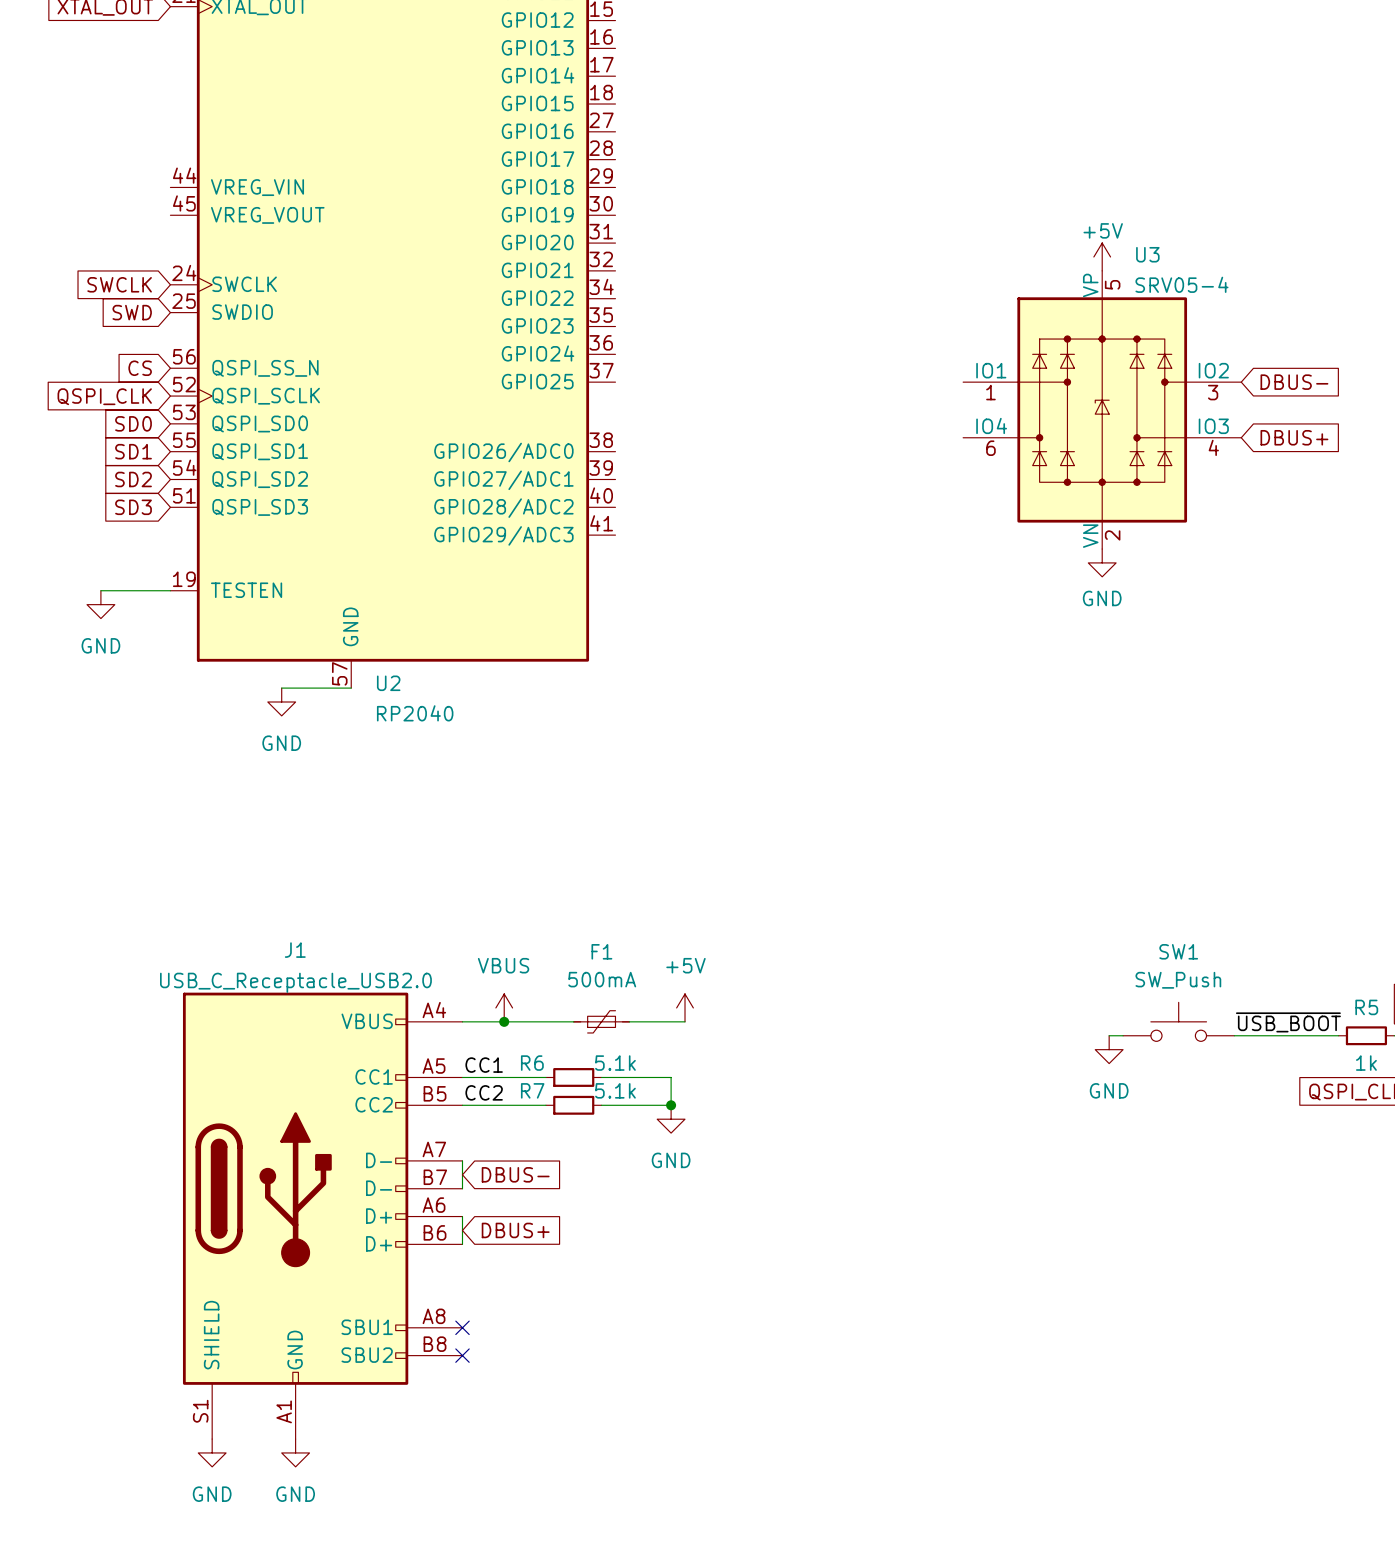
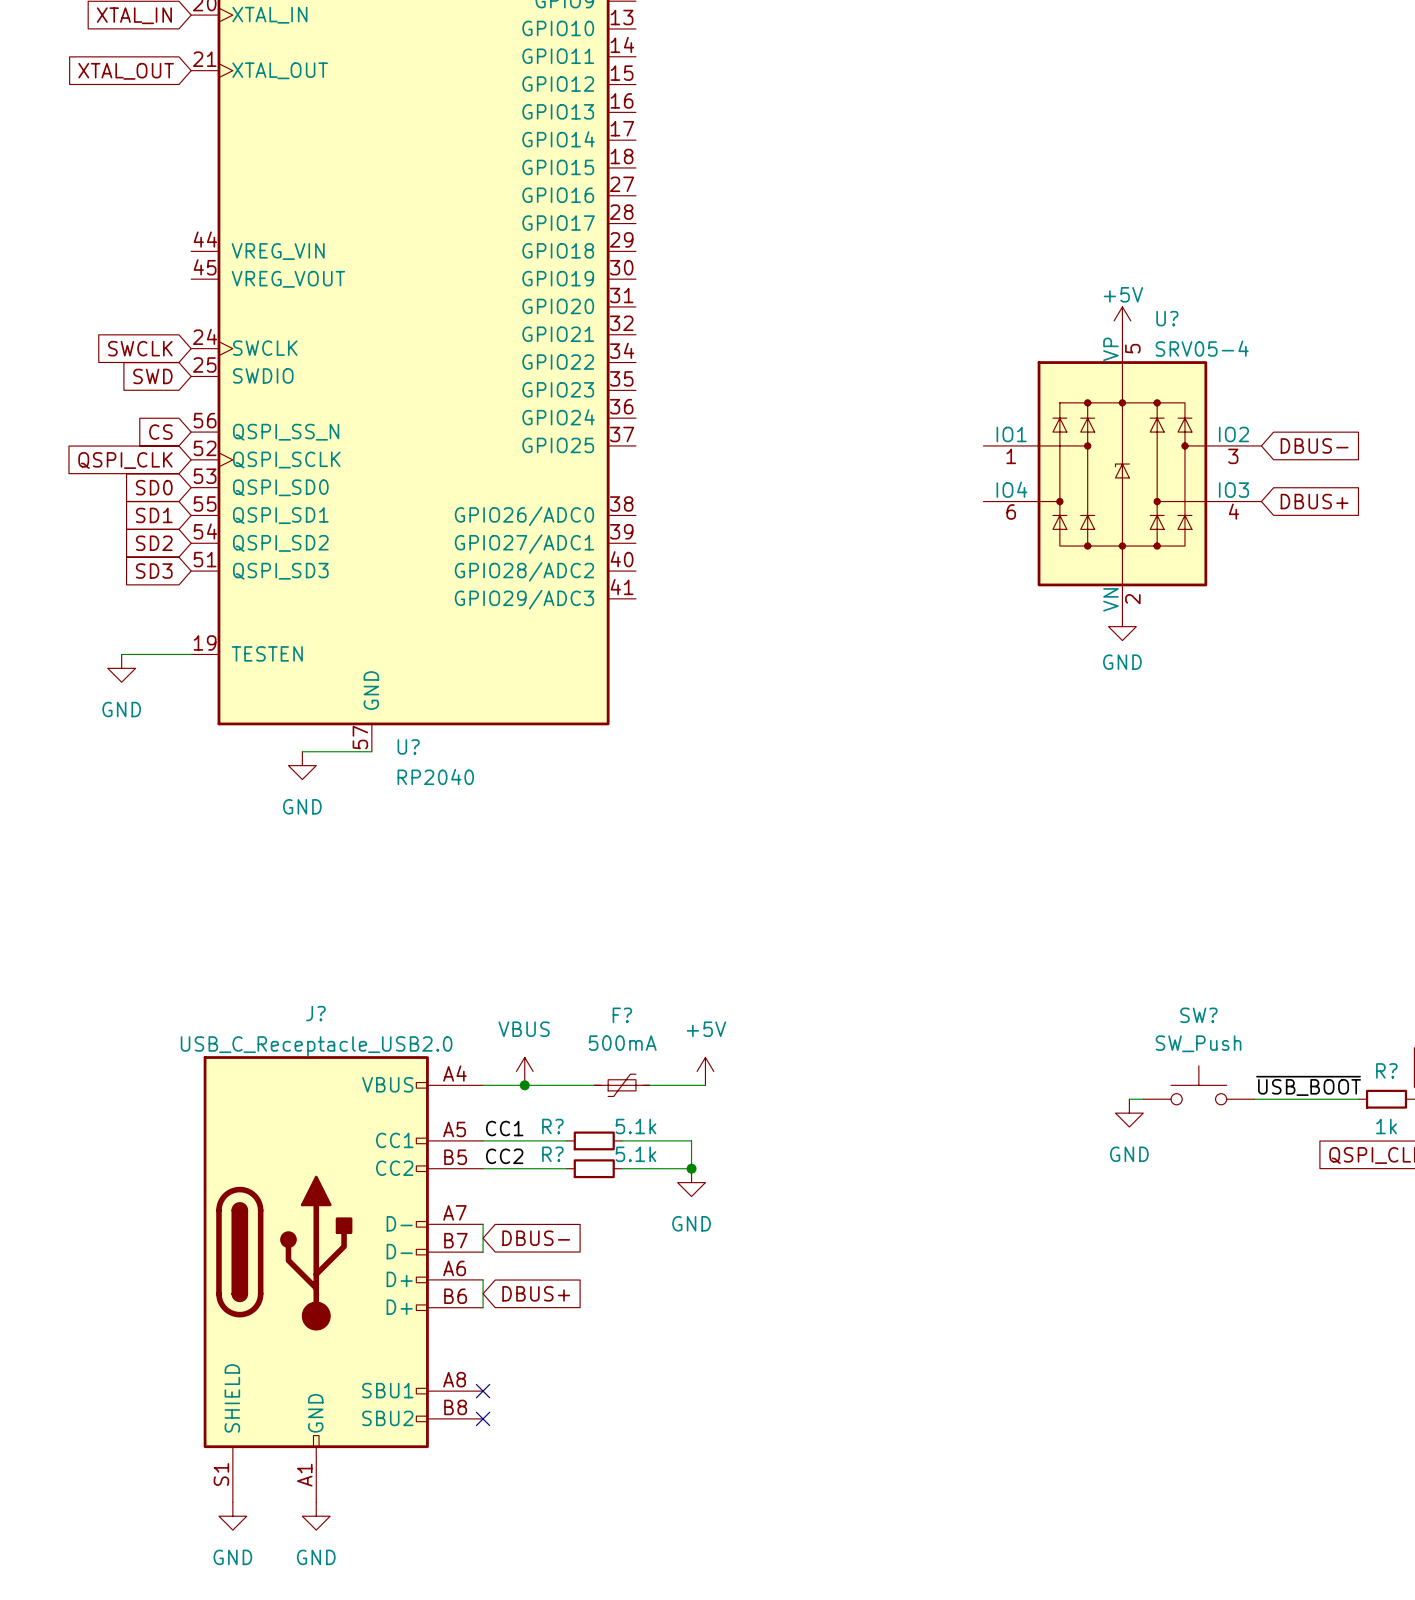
U3 name: U3 (1147, 254) -> U? (1167, 318)
U2 name: U2 (388, 683) -> U? (408, 746)
J1 name: J1 (295, 950) -> J? (315, 1013)
F1 name: F1 (601, 951) -> F? (622, 1015)
SW1 name: SW1 (1178, 951) -> SW? (1198, 1015)
R5 name: R5 (1366, 1007) -> R? (1386, 1070)
R6 name: R6 (532, 1063) -> R? (552, 1126)
R7 name: R7 (532, 1090) -> R? (552, 1154)

